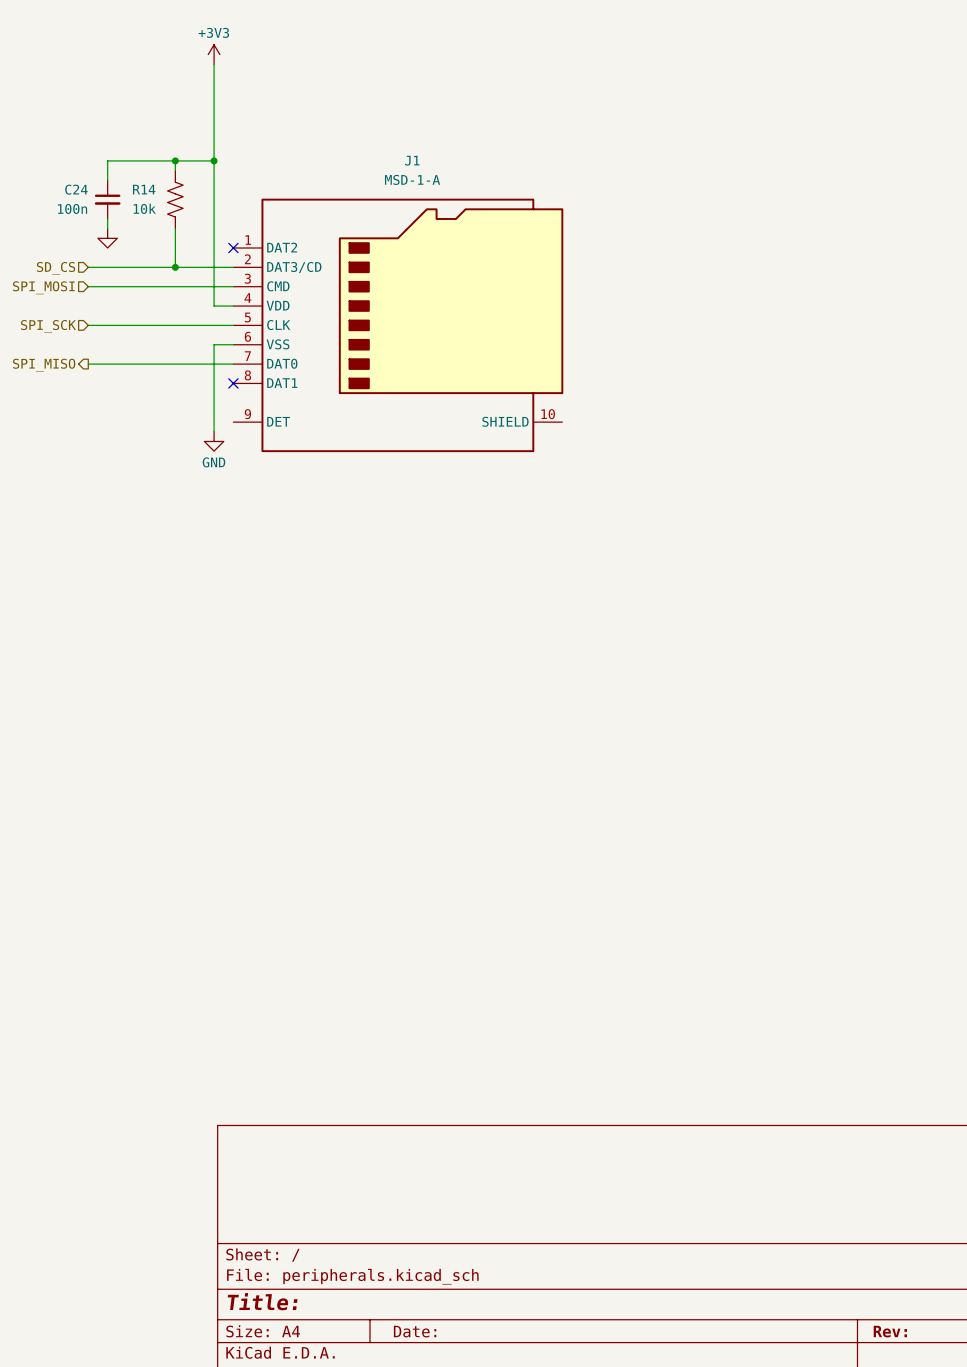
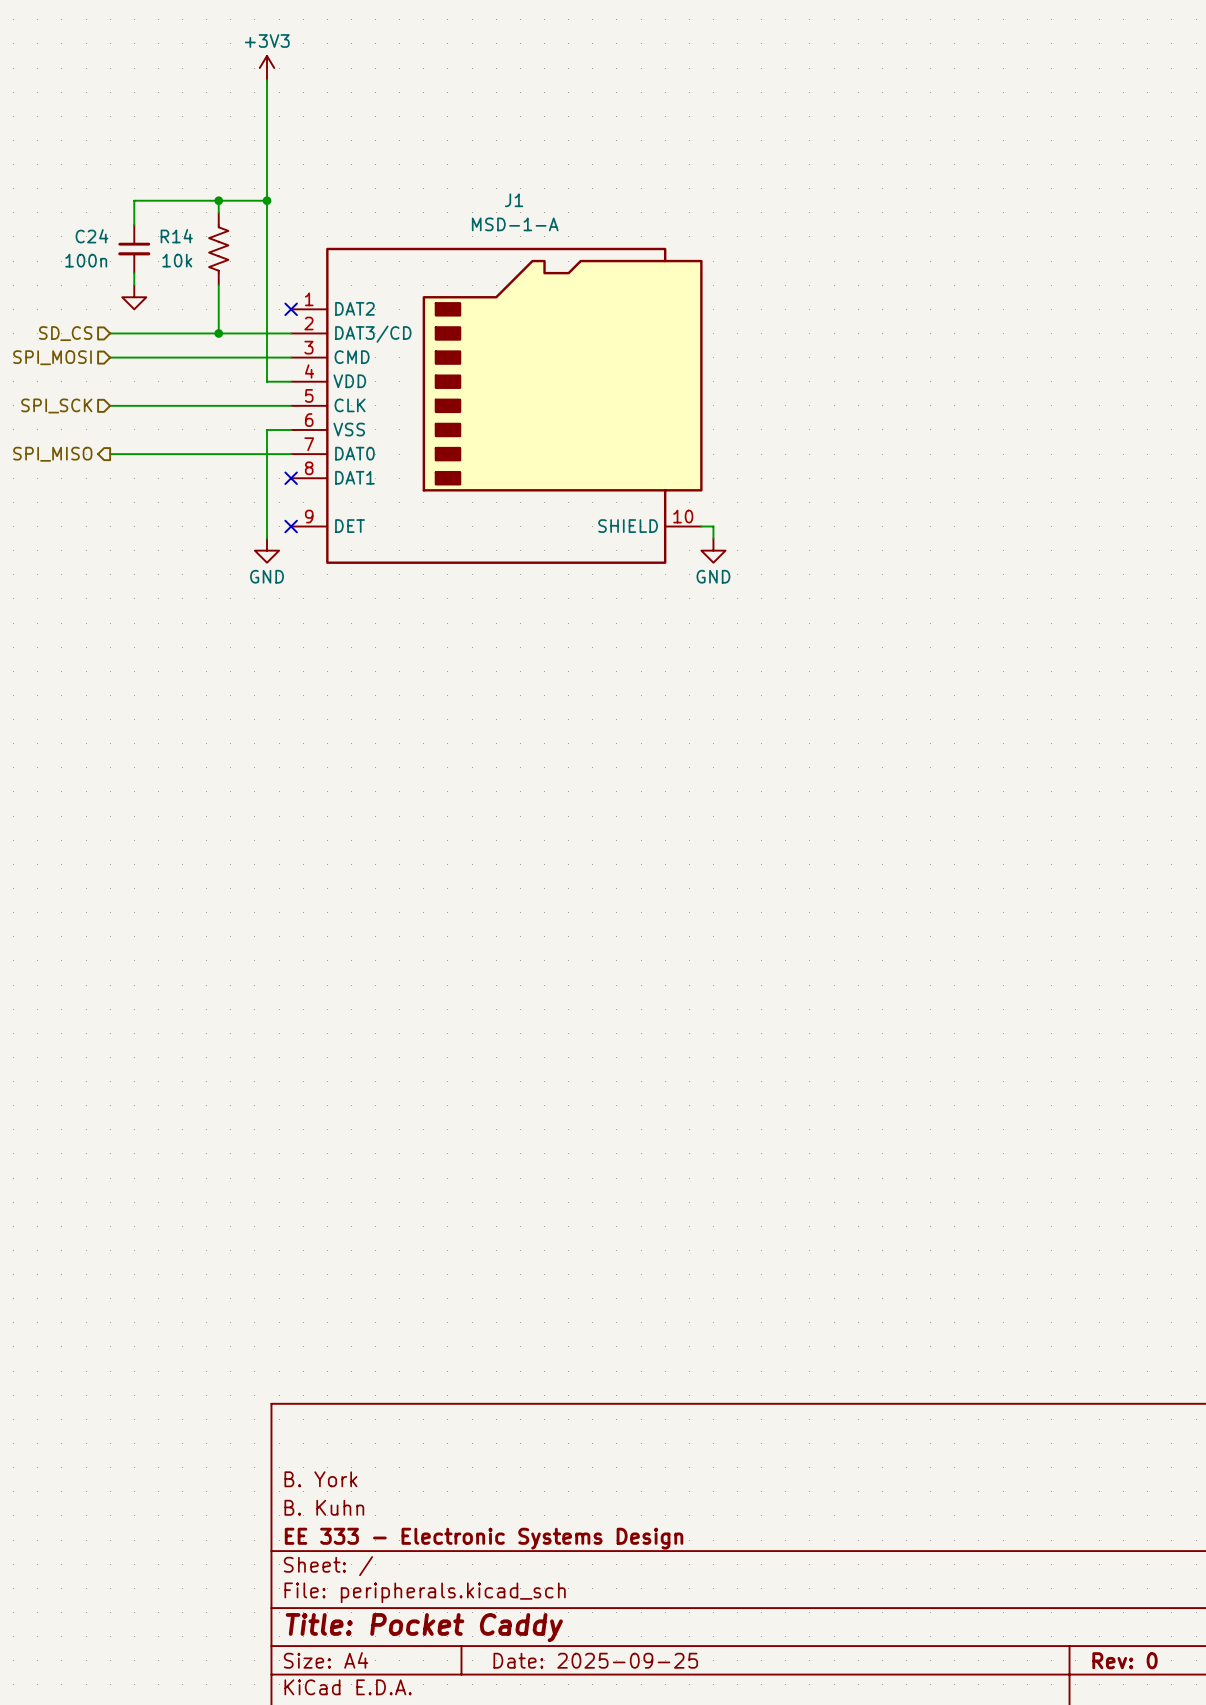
no-connect mark: none -> (291, 526)
wire: none -> (701, 526) (713, 526) (713, 538)
power symbol: none -> GND (713, 550)
title block: none -> B. York (320, 1479)
title block: none -> B. Kuhn (324, 1507)
title block: none -> EE 333 - Electronic Systems Design (484, 1538)
title block: Title: (262, 1301) -> Title: Pocket Caddy (424, 1627)
title block: Date: (415, 1331) -> Date: 2025-09-25 (595, 1660)
title block: Rev: (890, 1331) -> Rev: 0 (1125, 1660)

